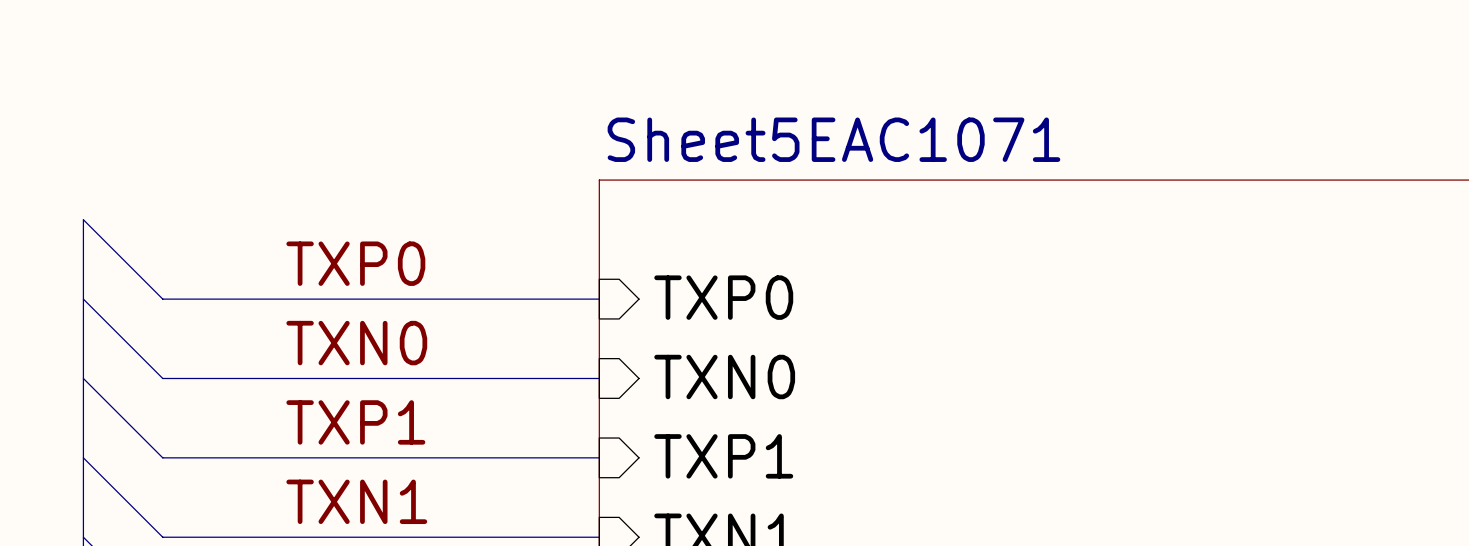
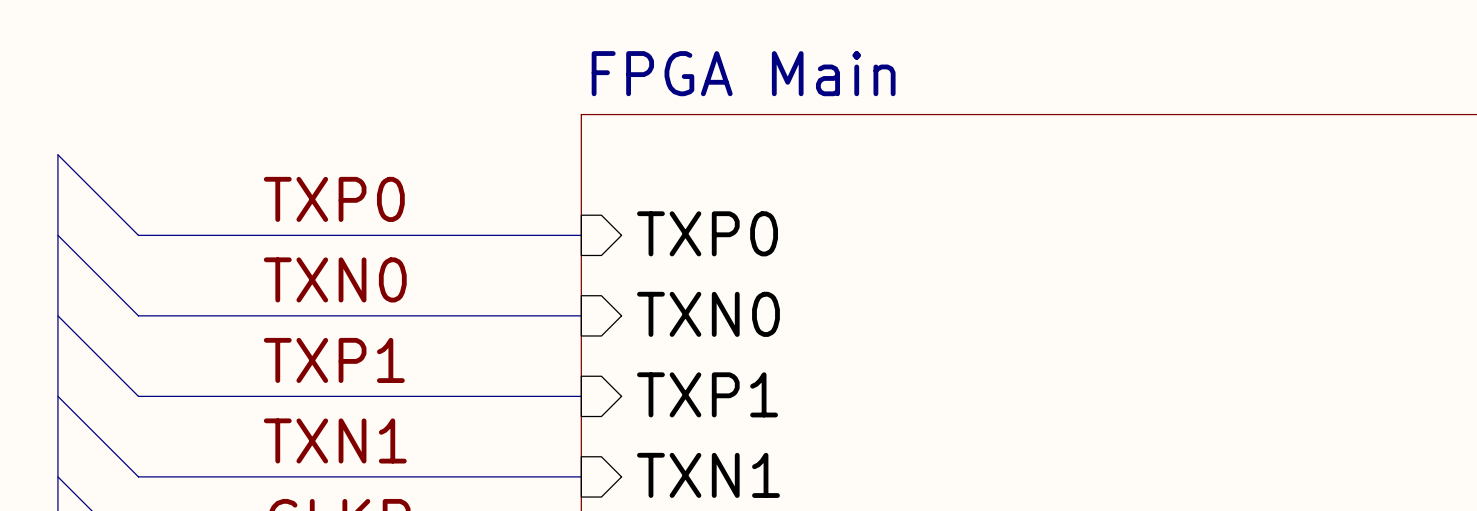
sheet Sheet5EAC1071 name: Sheet5EAC1071 (833, 139) -> FPGA Main (743, 73)

